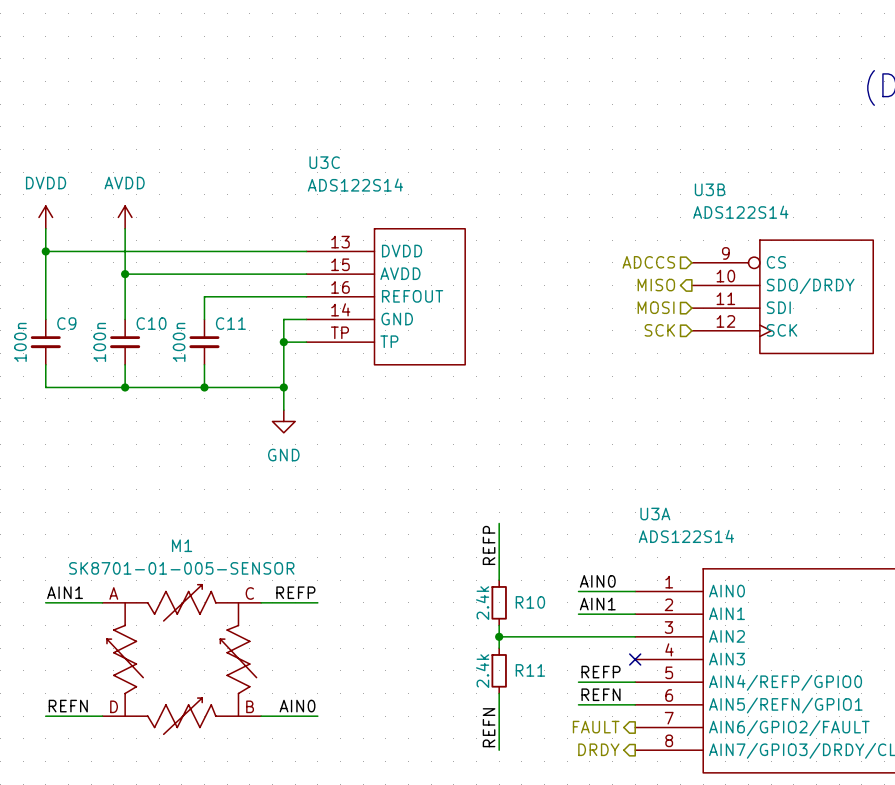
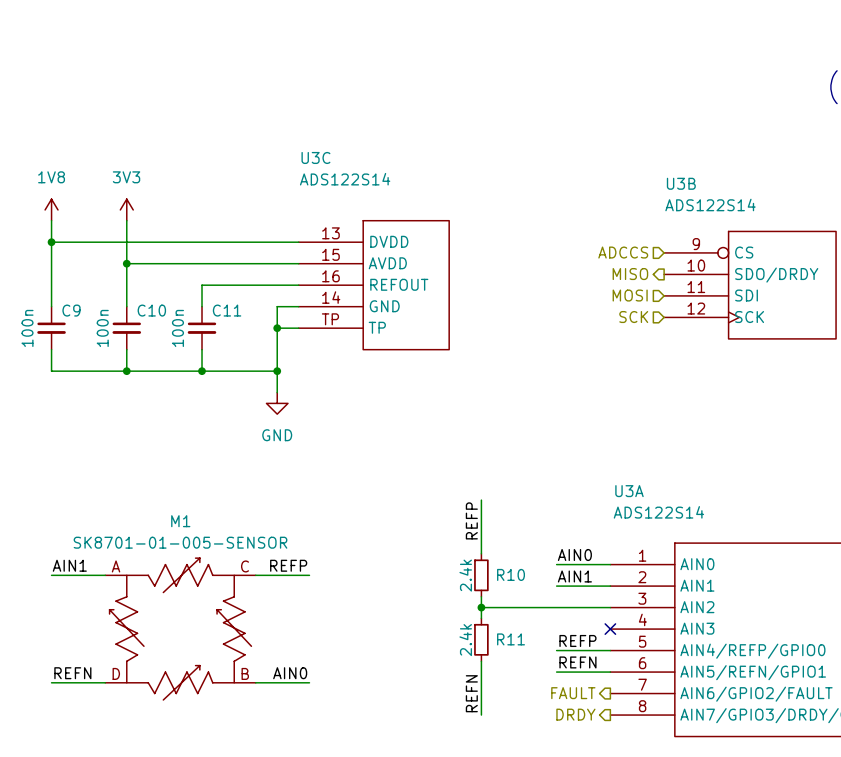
power symbol: DVDD (45, 217) -> 1V8 (51, 209)
power symbol: AVDD (125, 217) -> 3V3 (126, 209)

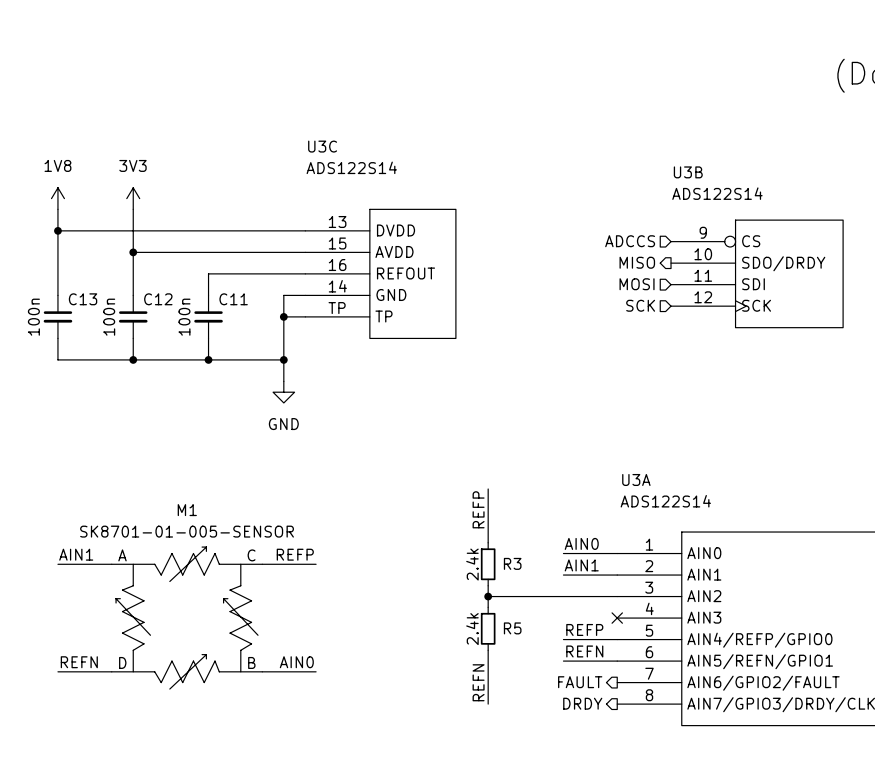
C9 name: C9 (71, 310) -> C13 (83, 299)
C10 name: C10 (151, 310) -> C12 (158, 299)
R10 name: R10 (511, 574) -> R3 (512, 563)
R11 name: R11 (511, 639) -> R5 (512, 628)

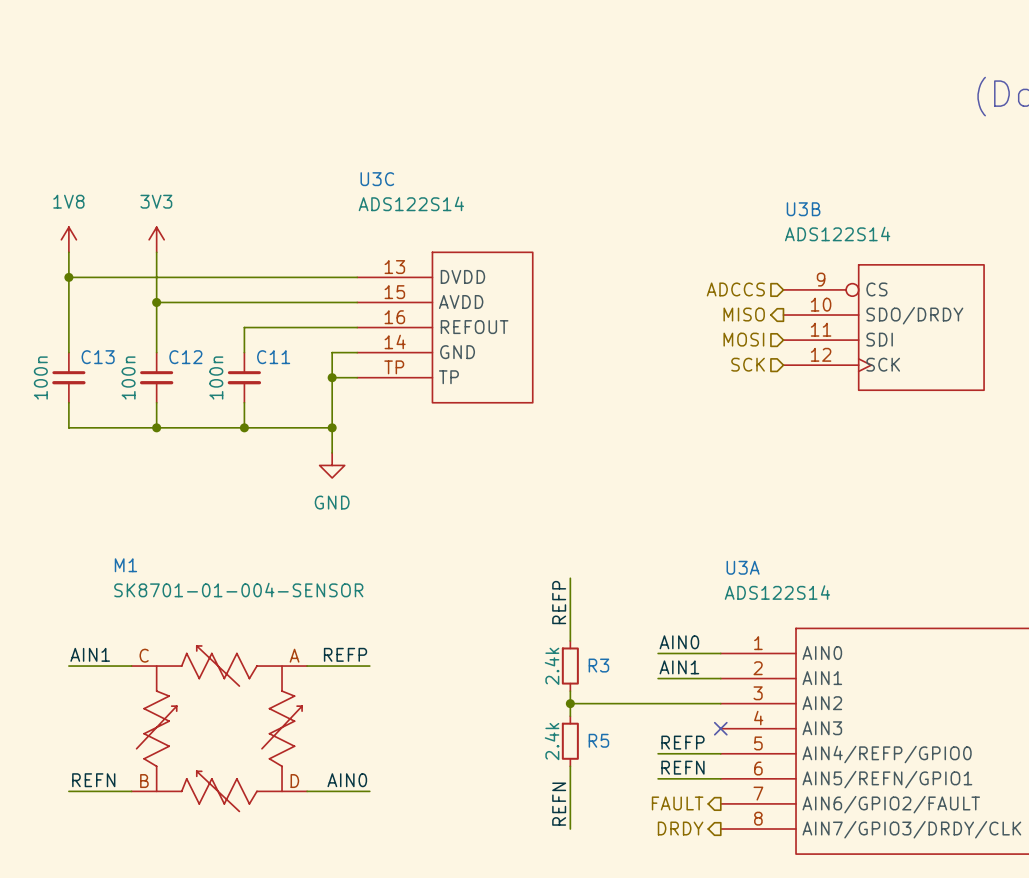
M1 name position: M1 (187, 510) -> M1 (125, 565)
M1 value: SK8701-01-005-SENSOR (187, 531) -> SK8701-01-004-SENSOR (238, 590)
M1 flip: as is (187, 618) -> left-right (219, 728)

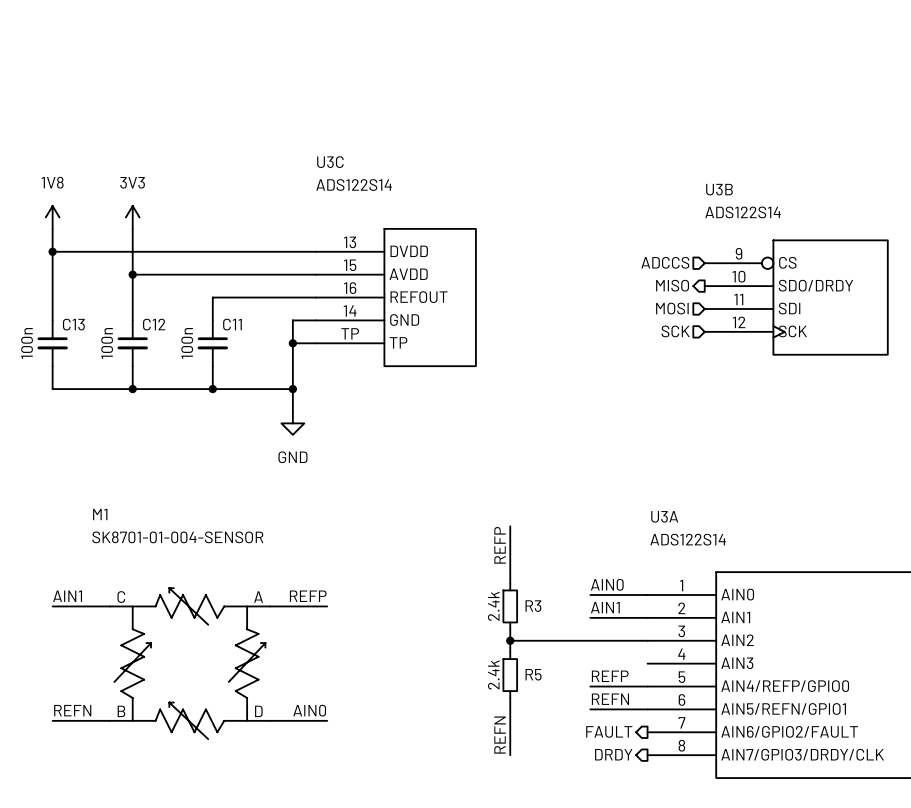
no-connect mark: (720, 728) -> none

